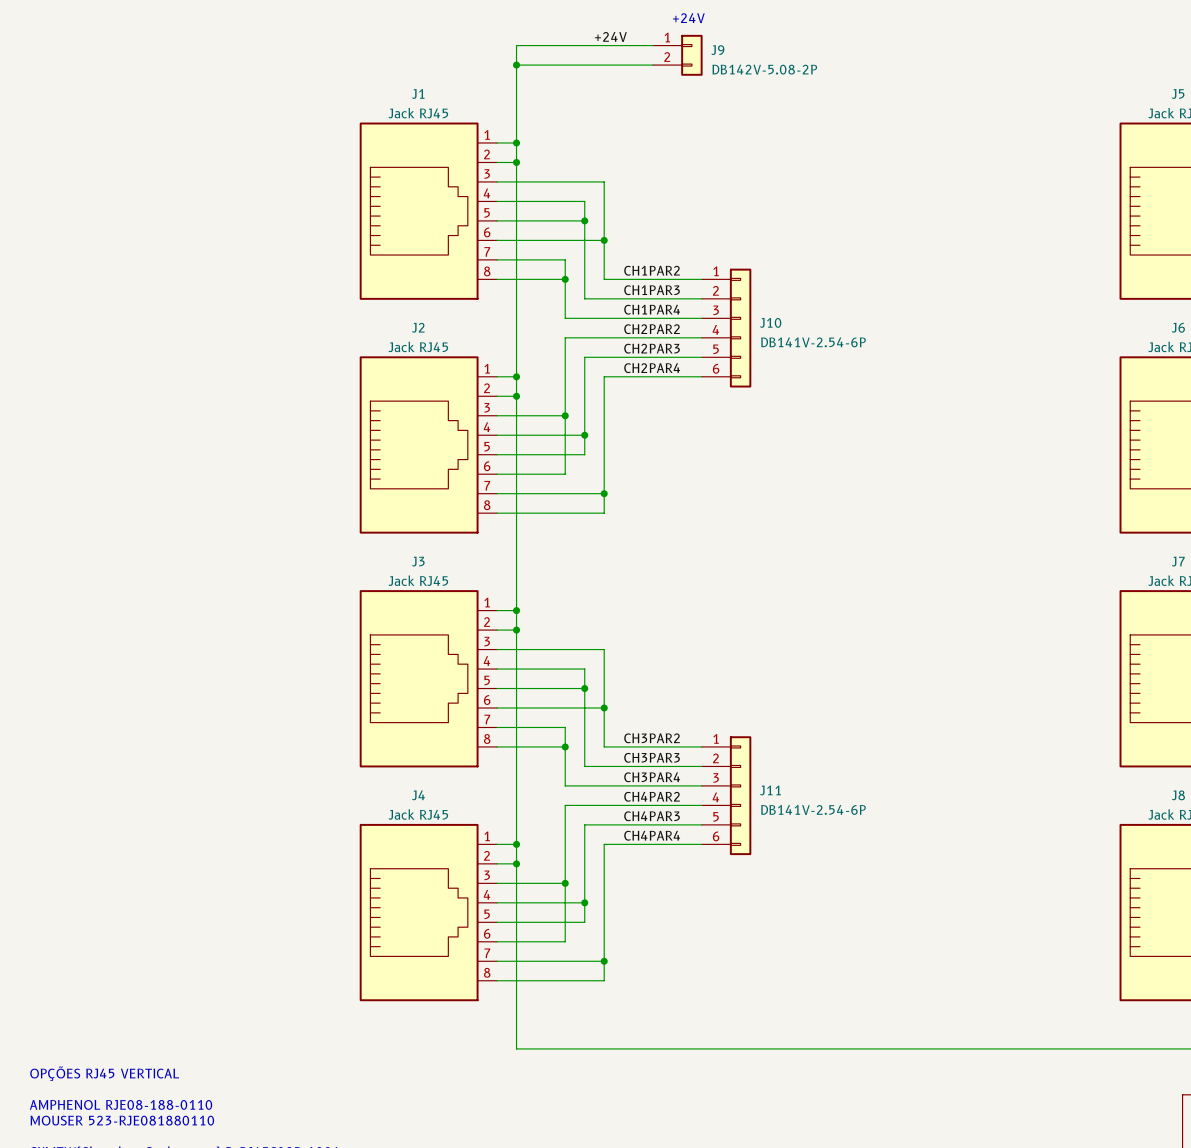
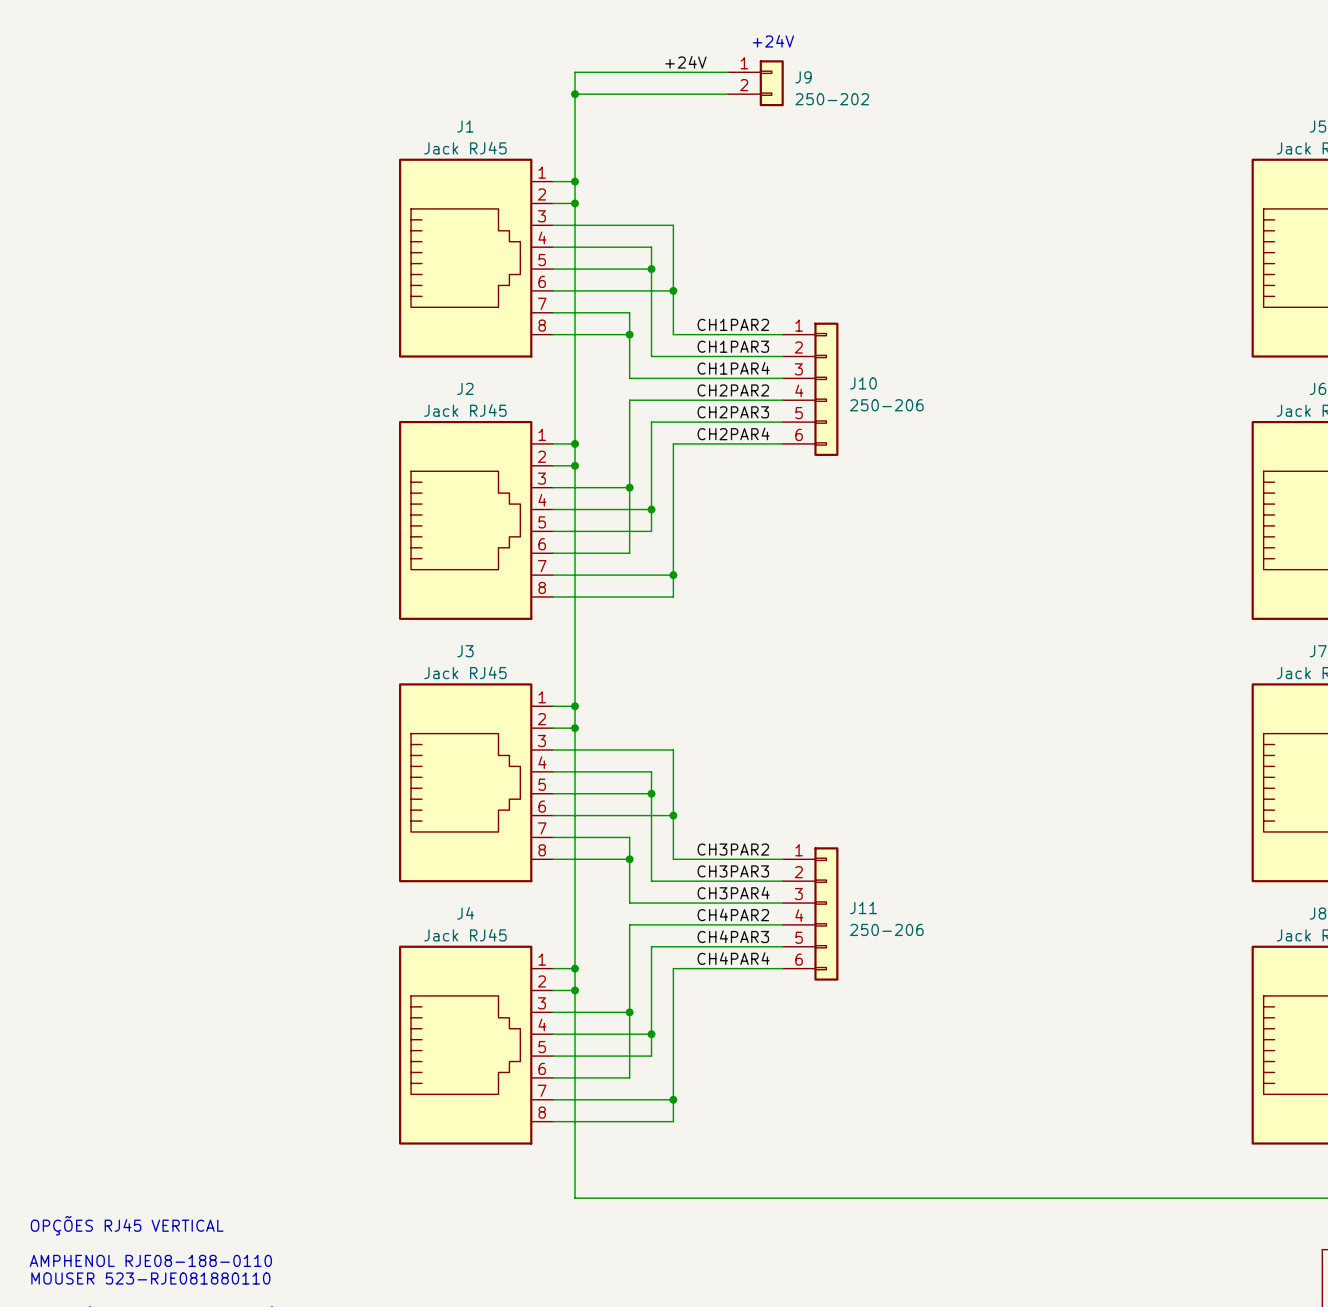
J9 value: DB142V-5.08-2P (764, 69) -> 250-202 (832, 99)
J10 value: DB141V-2.54-6P (813, 342) -> 250-206 (886, 405)
J11 value: DB141V-2.54-6P (813, 809) -> 250-206 (886, 929)

